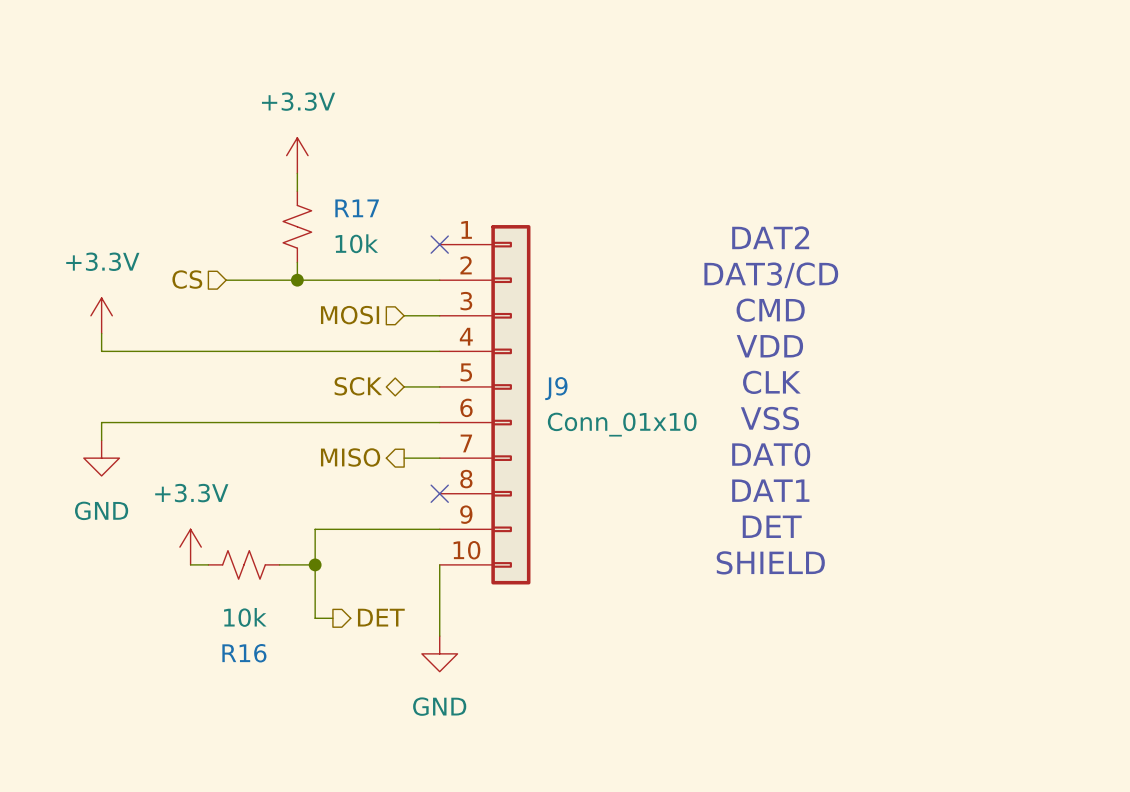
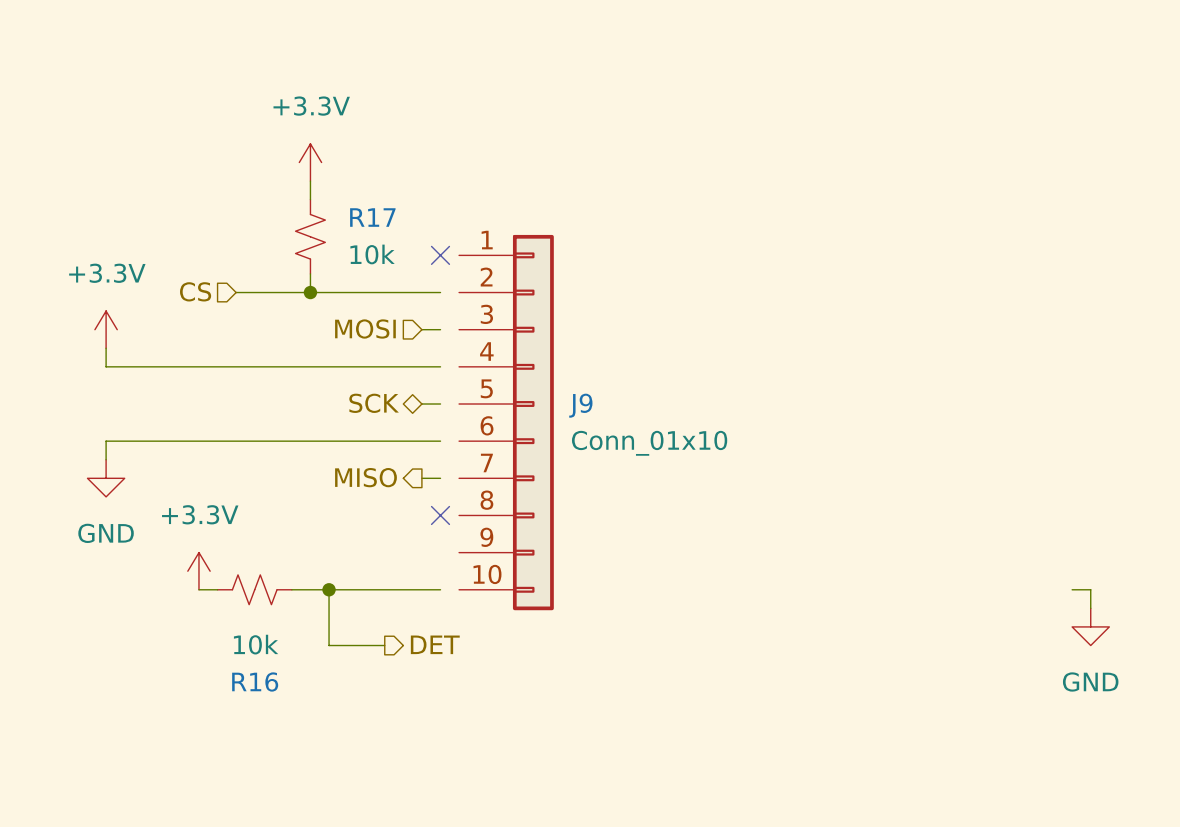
text: DAT2 (770, 237) -> none
no-connect mark position: (439, 244) -> (440, 255)
text: DAT3/CD (771, 275) -> none
wire: (421, 280) (439, 280) -> none
text: CMD (770, 310) -> none
wire: (421, 315) (439, 315) -> none
text: VDD (769, 346) -> none
wire: (421, 351) (439, 351) -> none
text: CLK (771, 382) -> none
wire: (421, 386) (439, 386) -> none
text: VSS (769, 418) -> none
wire: (421, 422) (439, 422) -> none
text: DAT0 (771, 454) -> none
wire: (421, 458) (439, 458) -> none
text: DAT1 (770, 490) -> none
no-connect mark position: (439, 493) -> (440, 515)
text: DET (772, 526) -> none
wire: (439, 529) (315, 529) (315, 564) -> (440, 589) (329, 589)
text: SHIELD (770, 562) -> none
wire: (439, 564) (439, 636) -> none
wire: none -> (1072, 589) (1090, 589) (1090, 608)
power symbol: none -> GND (1090, 626)
hierarchical label position: DET (381, 617) -> DET (435, 644)
wire: none -> (347, 645) (384, 645)
power symbol: GND (439, 653) -> none

